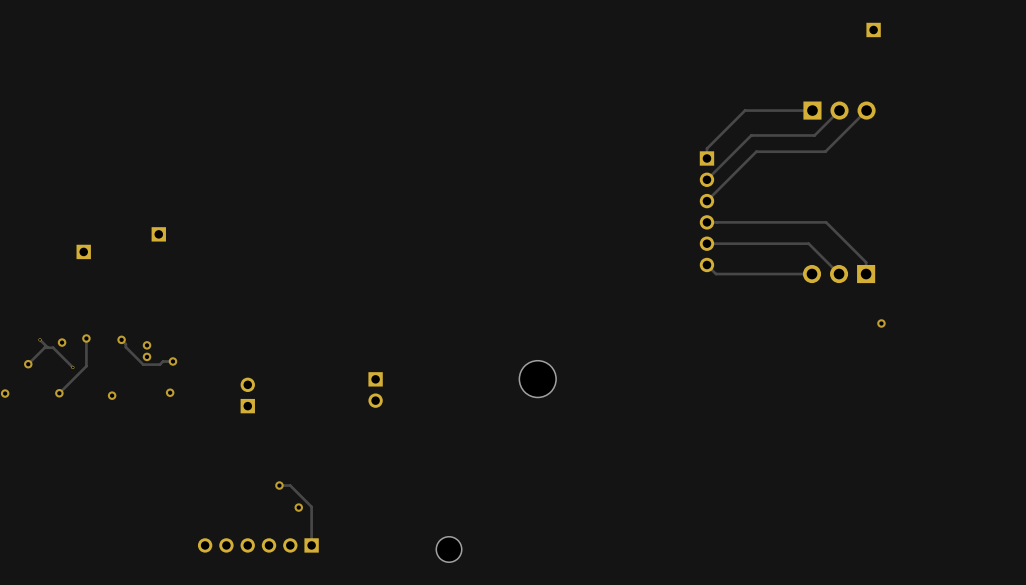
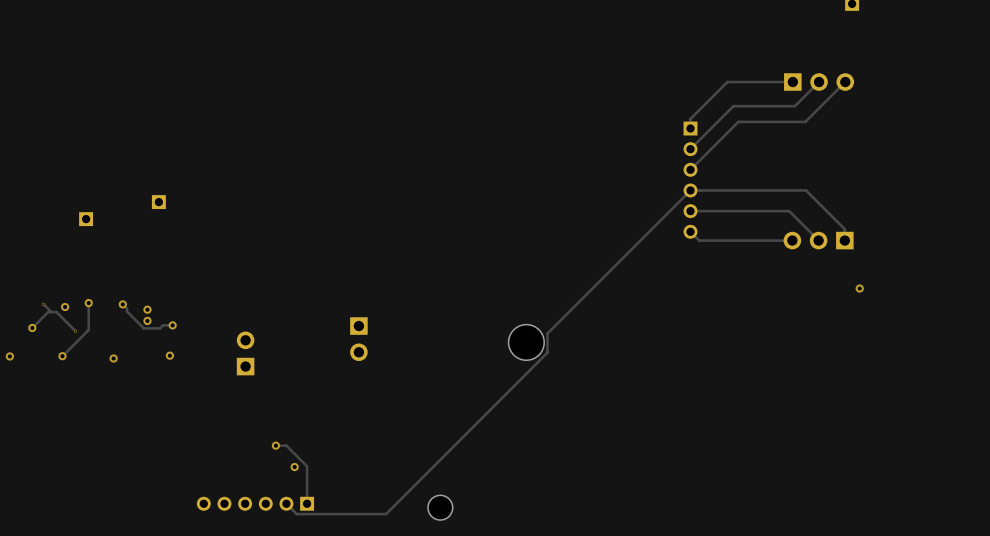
track: none -> (690, 190) (547, 333) (547, 352) (386, 514) (296, 514) (286, 503)
part: none -> (358, 339)
part footprint: [240, 377, 255, 414] -> [236, 331, 255, 376]
part: (375, 389) -> none

